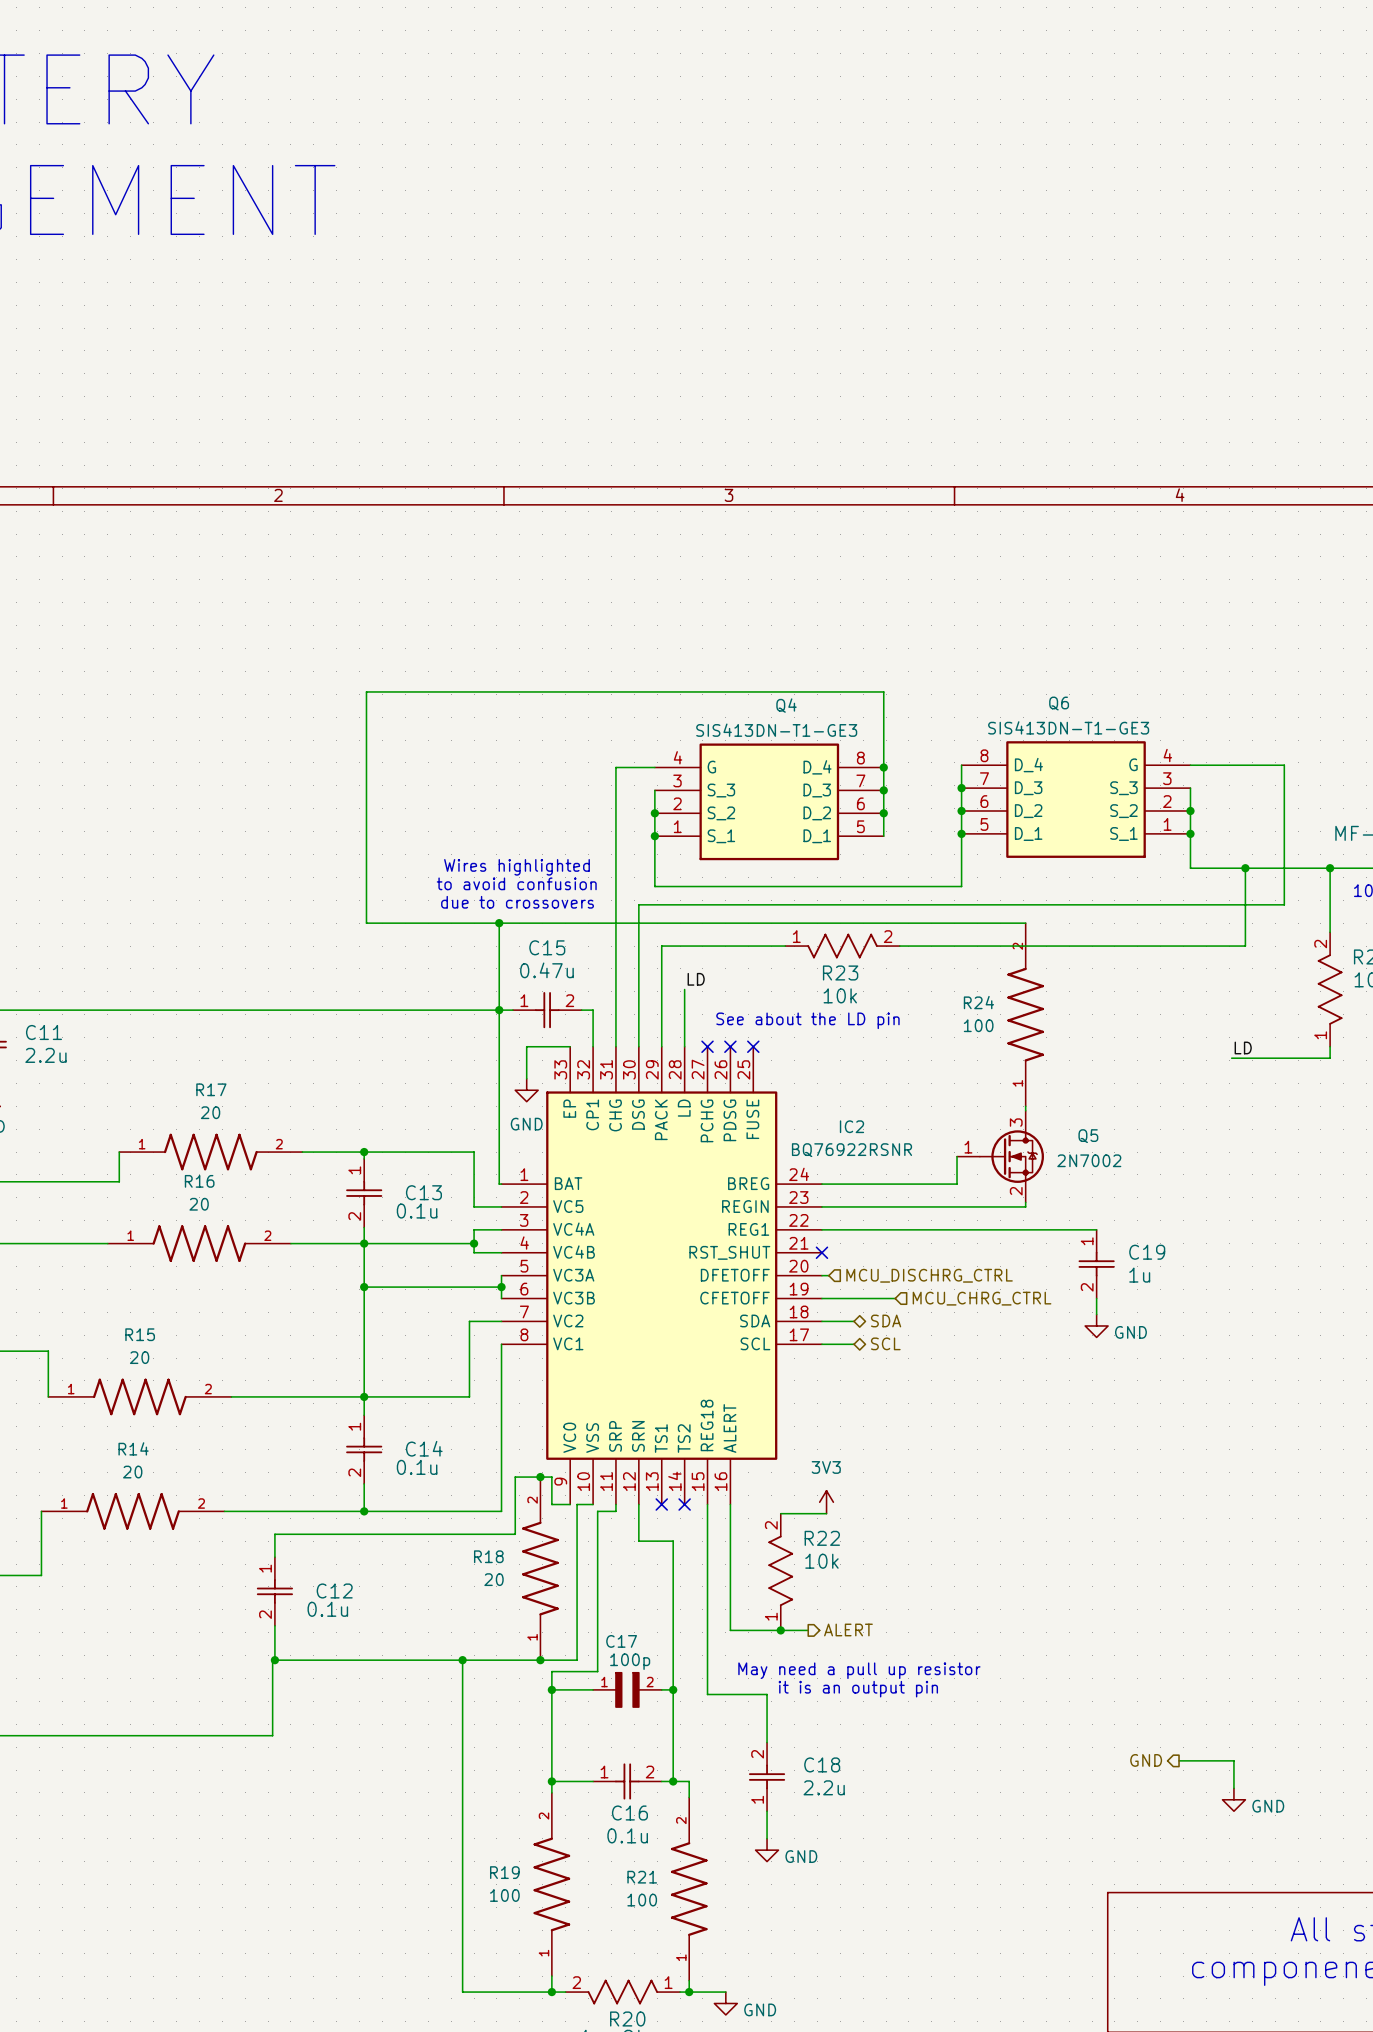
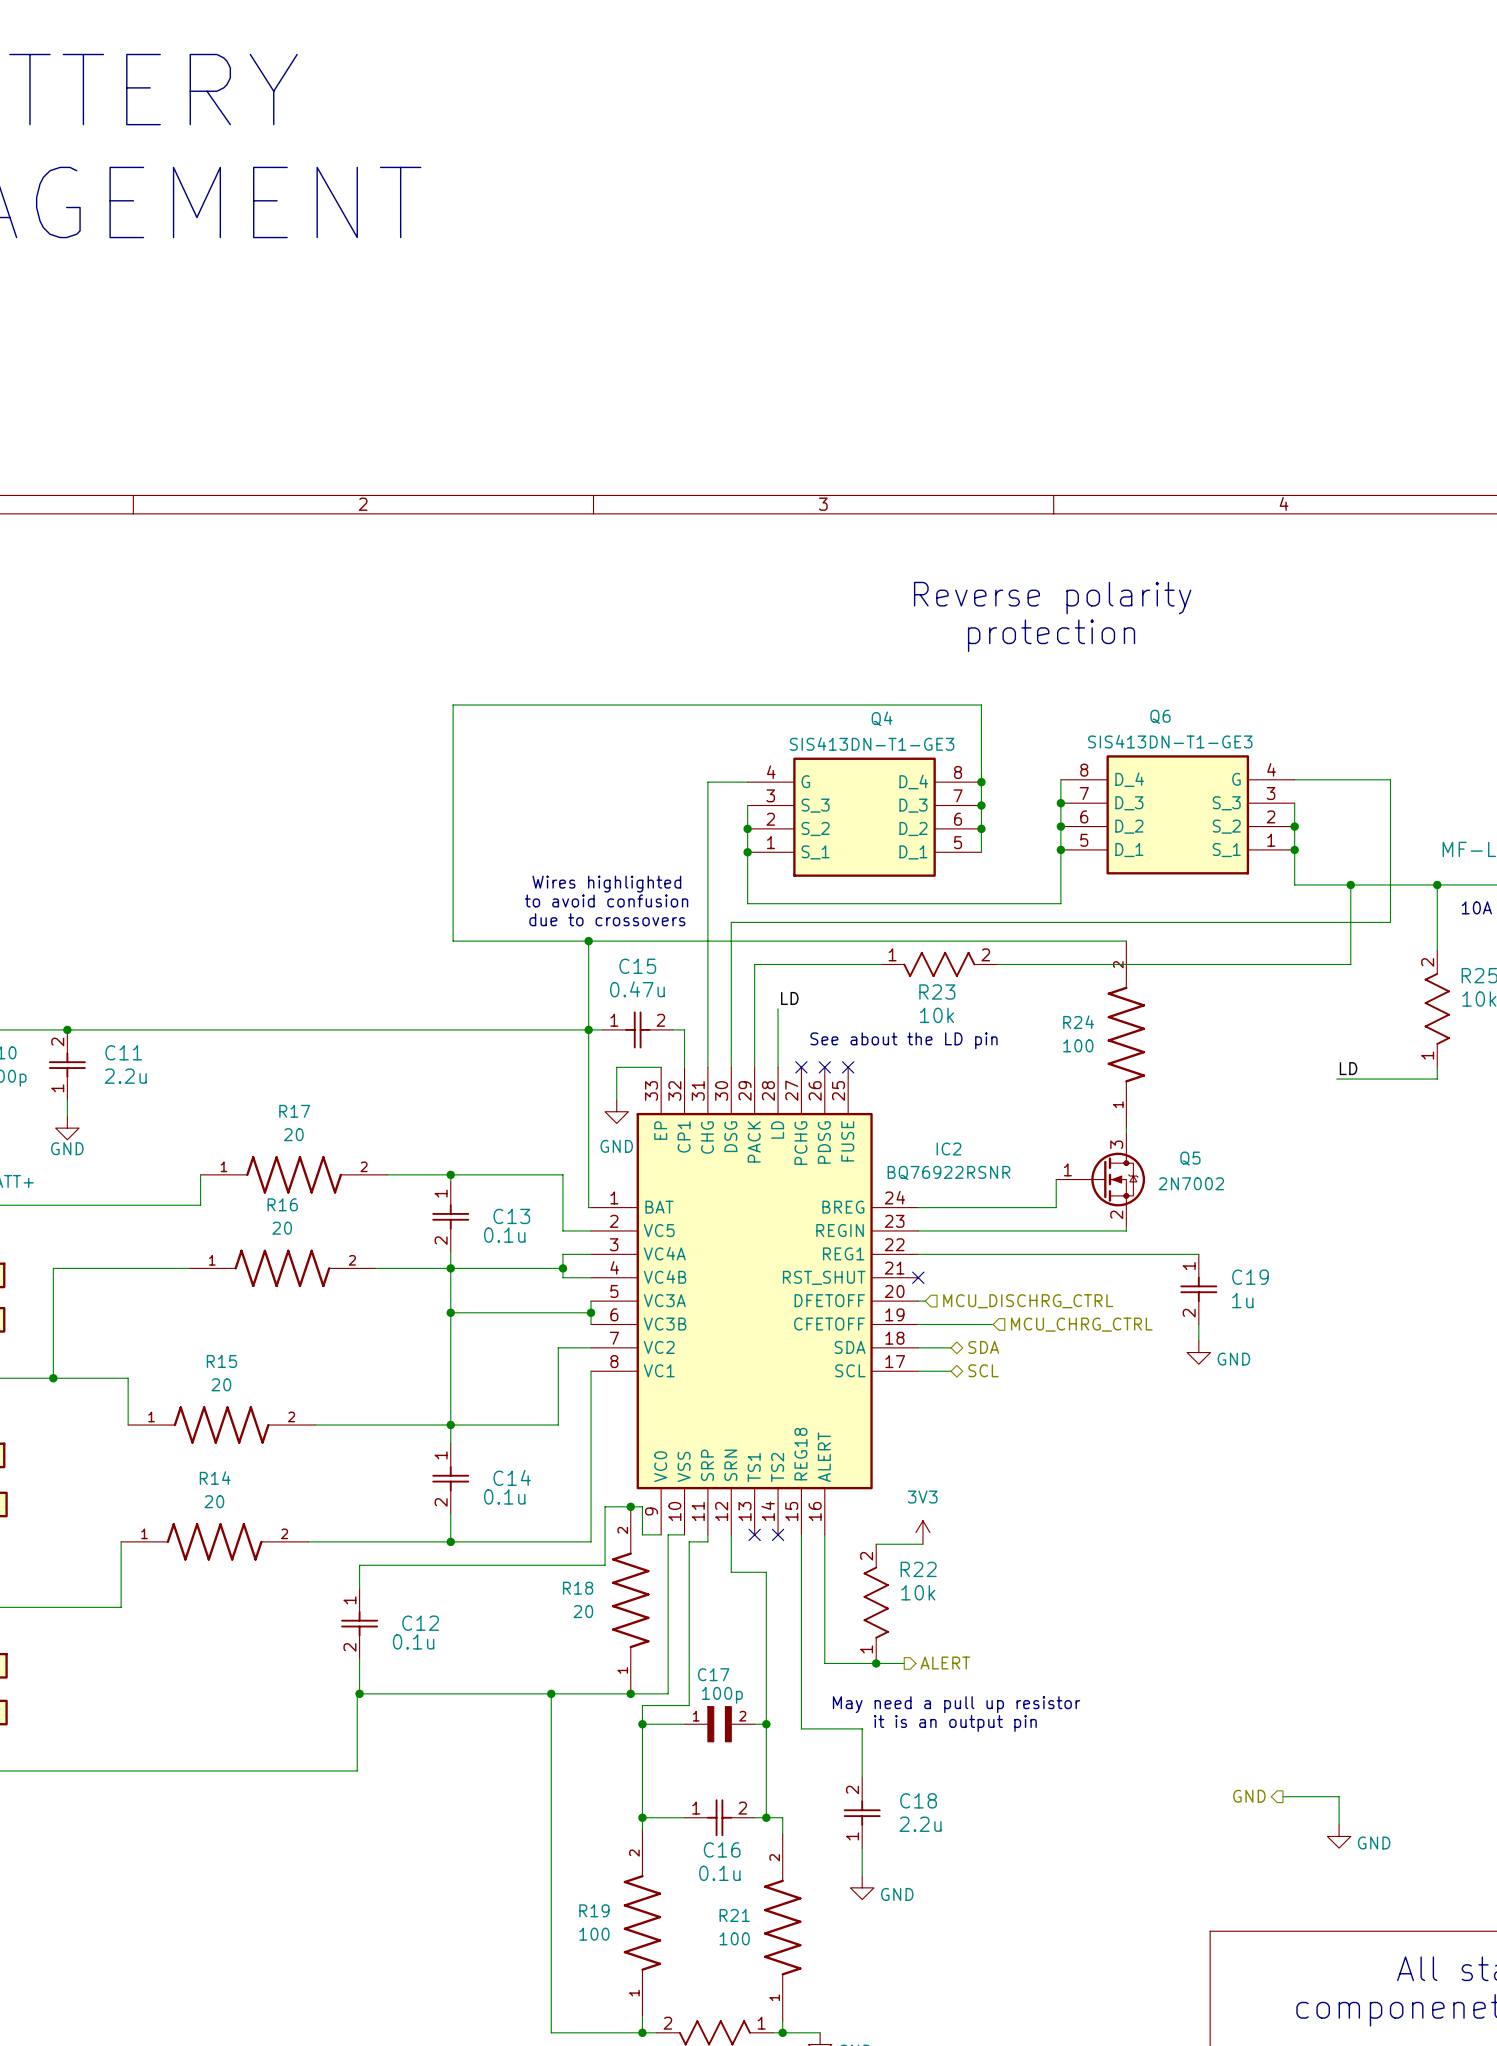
text: none -> Reverse polarity (1052, 598)
text: none -> protection (1051, 635)

